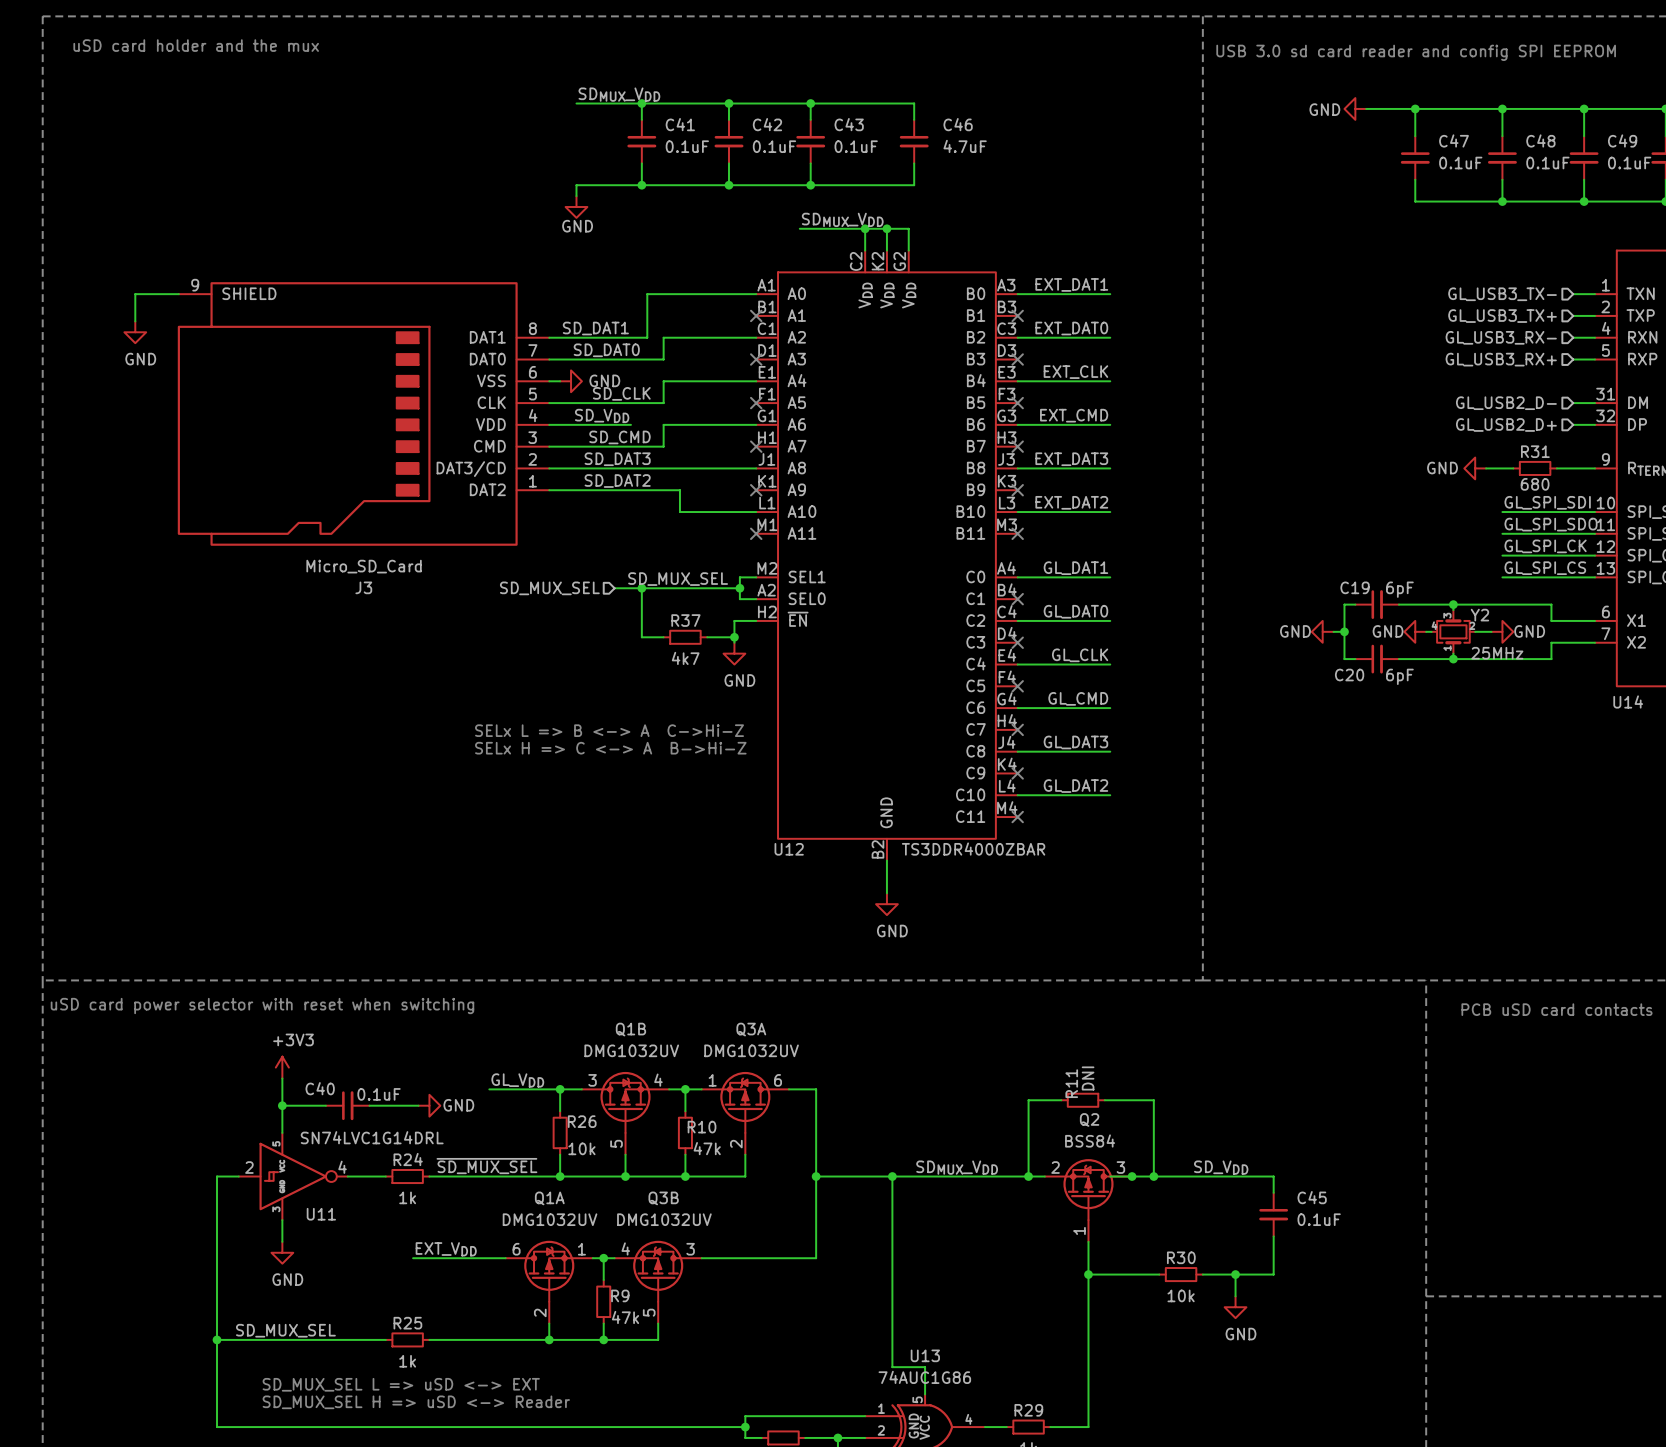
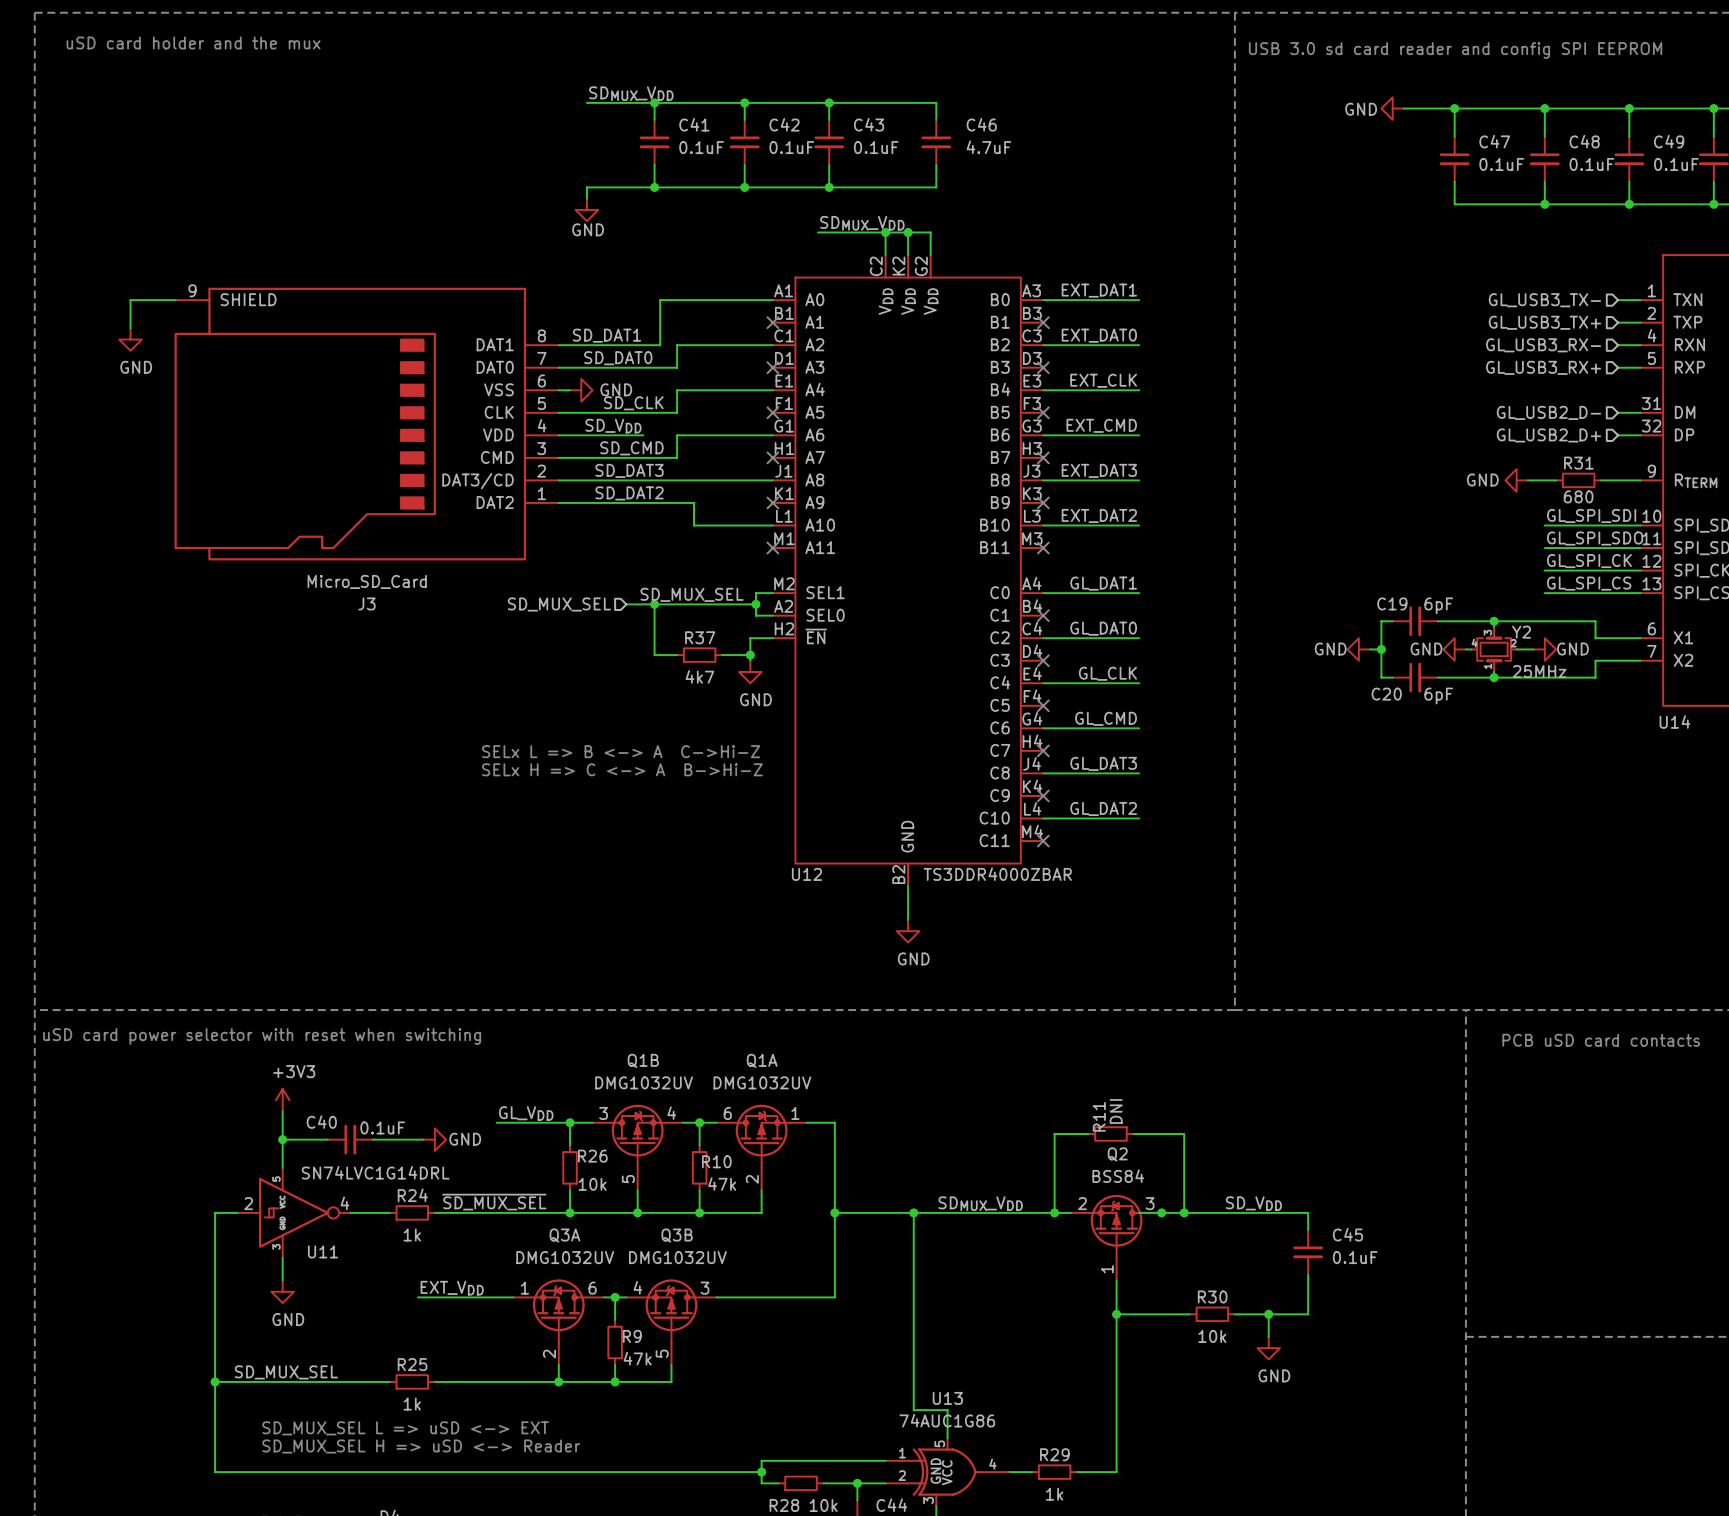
Q3A position: (745, 1113) -> (558, 1322)
Q1A position: (549, 1282) -> (761, 1147)

